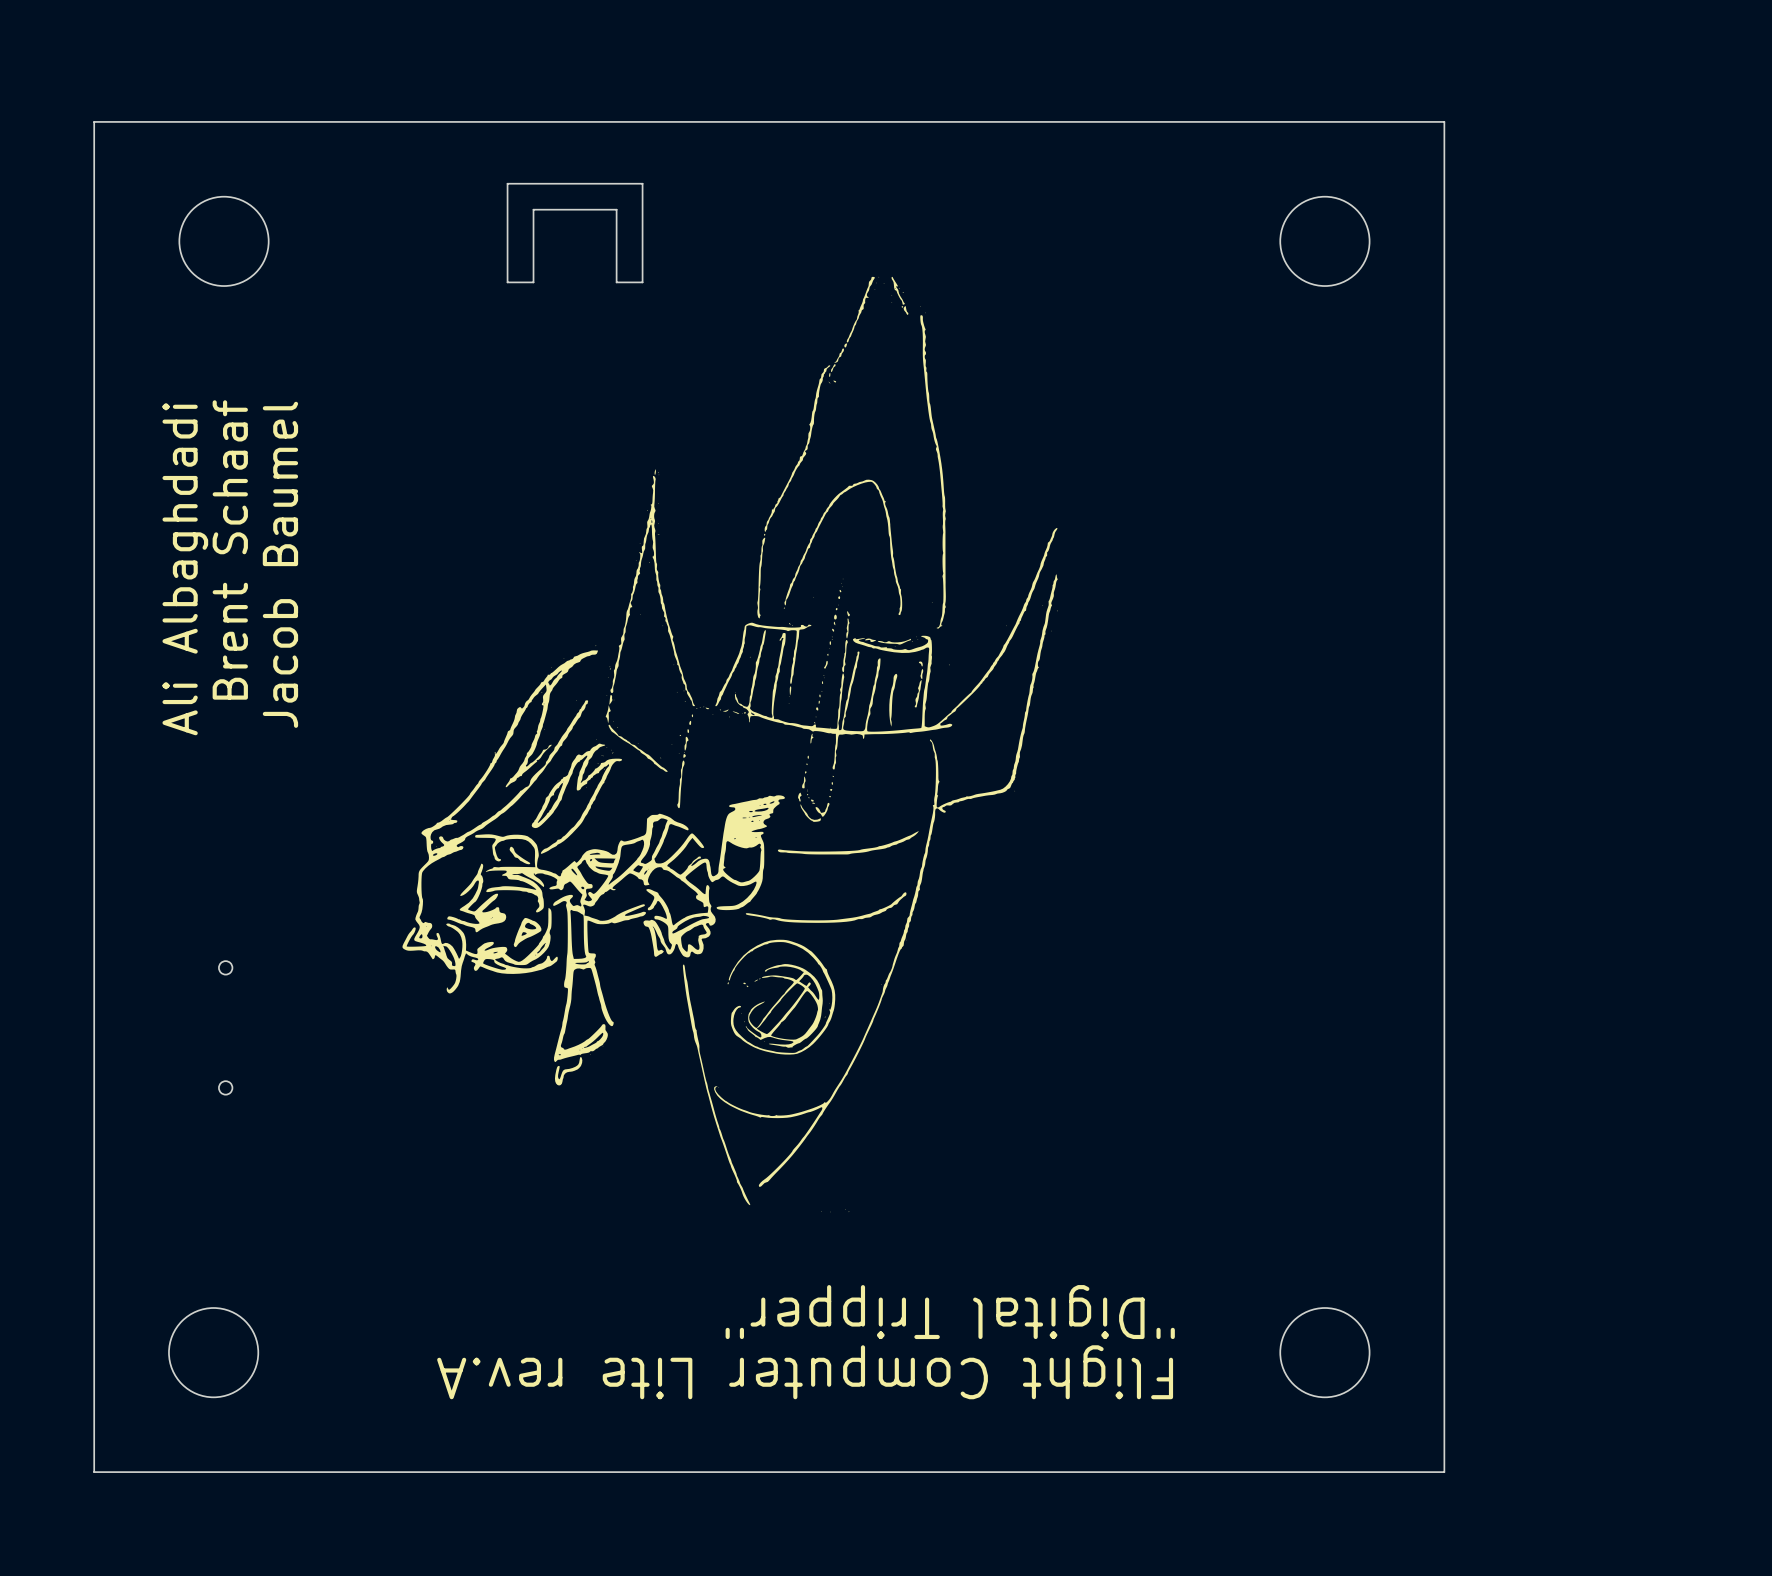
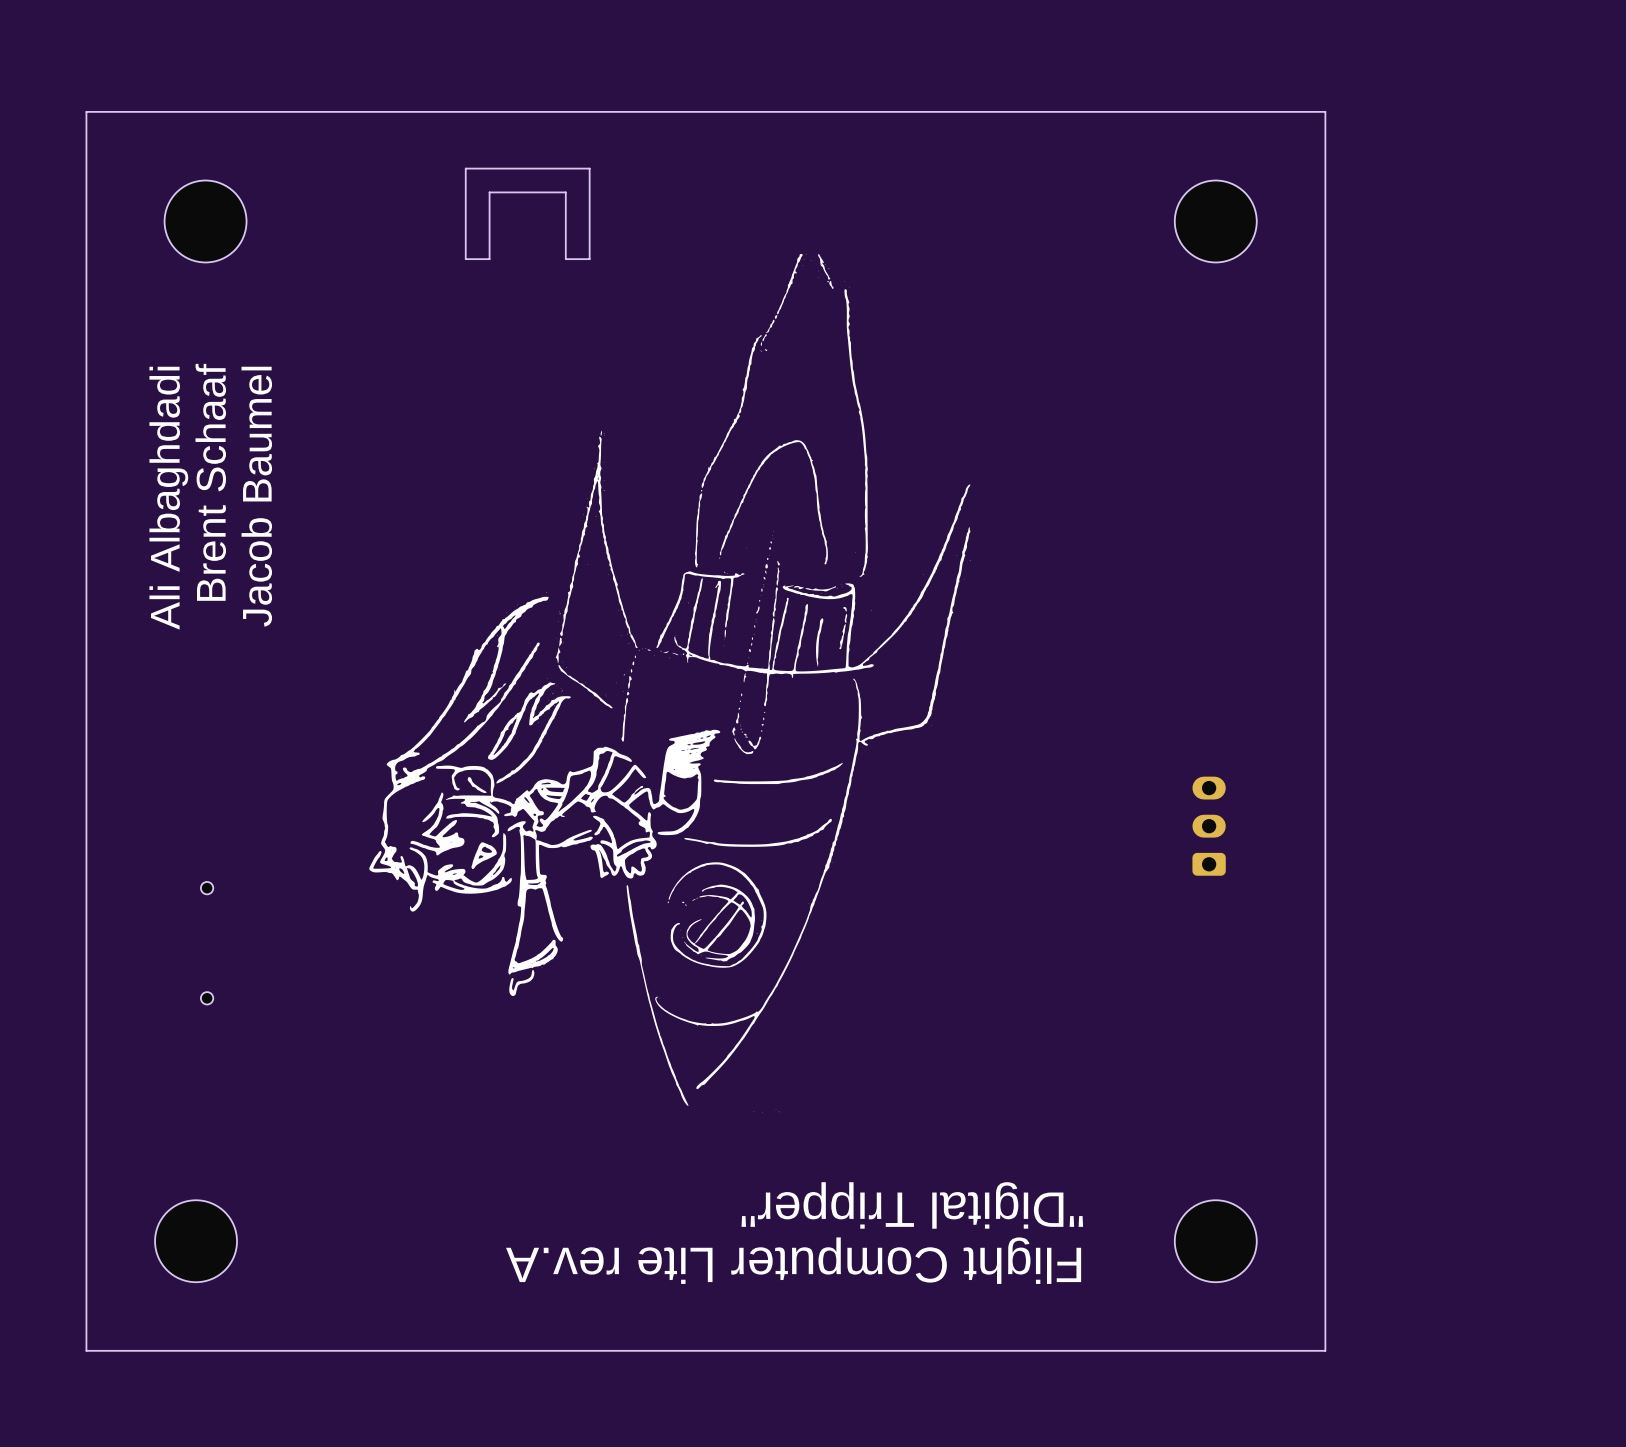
part: none -> (1209, 826)

